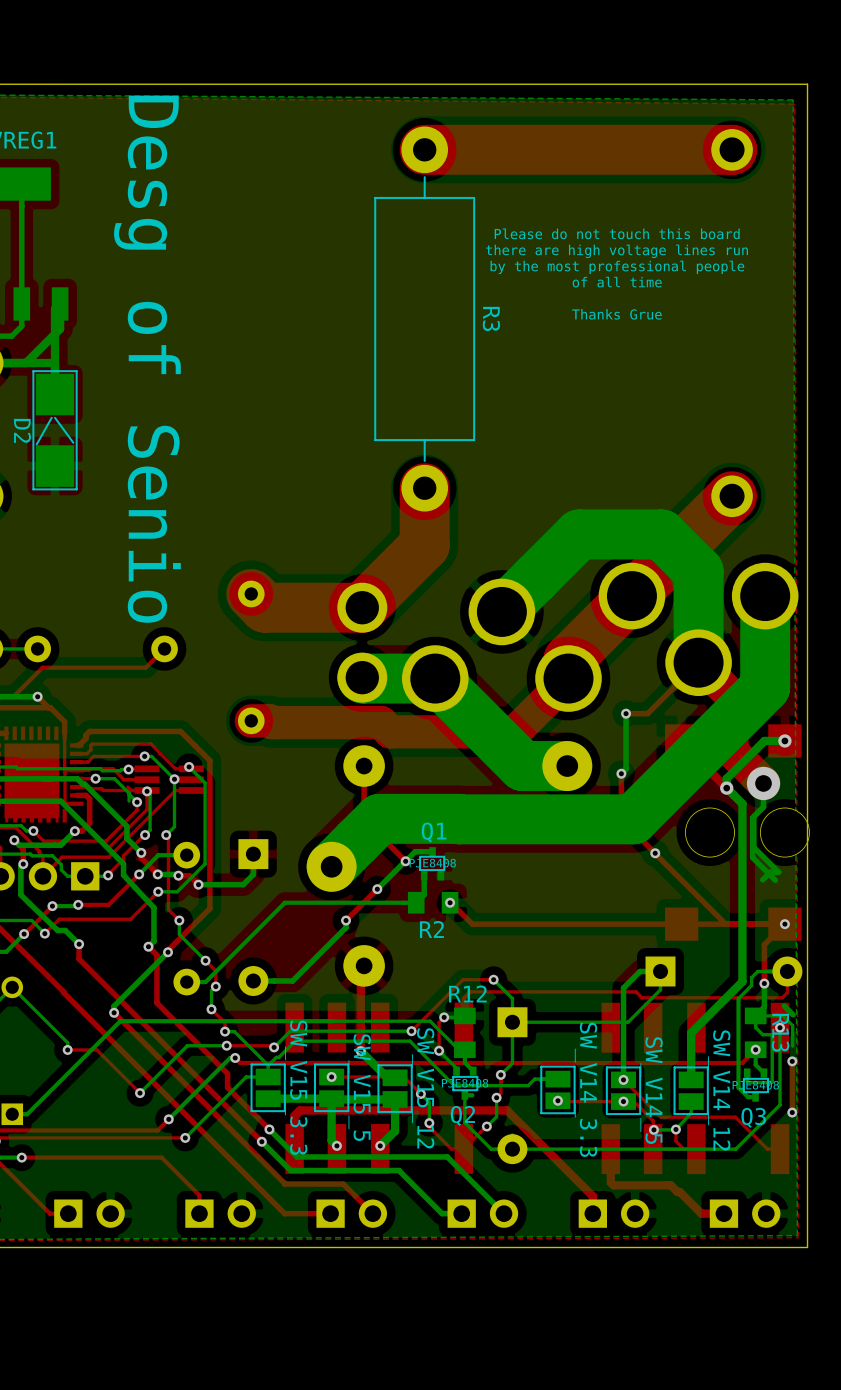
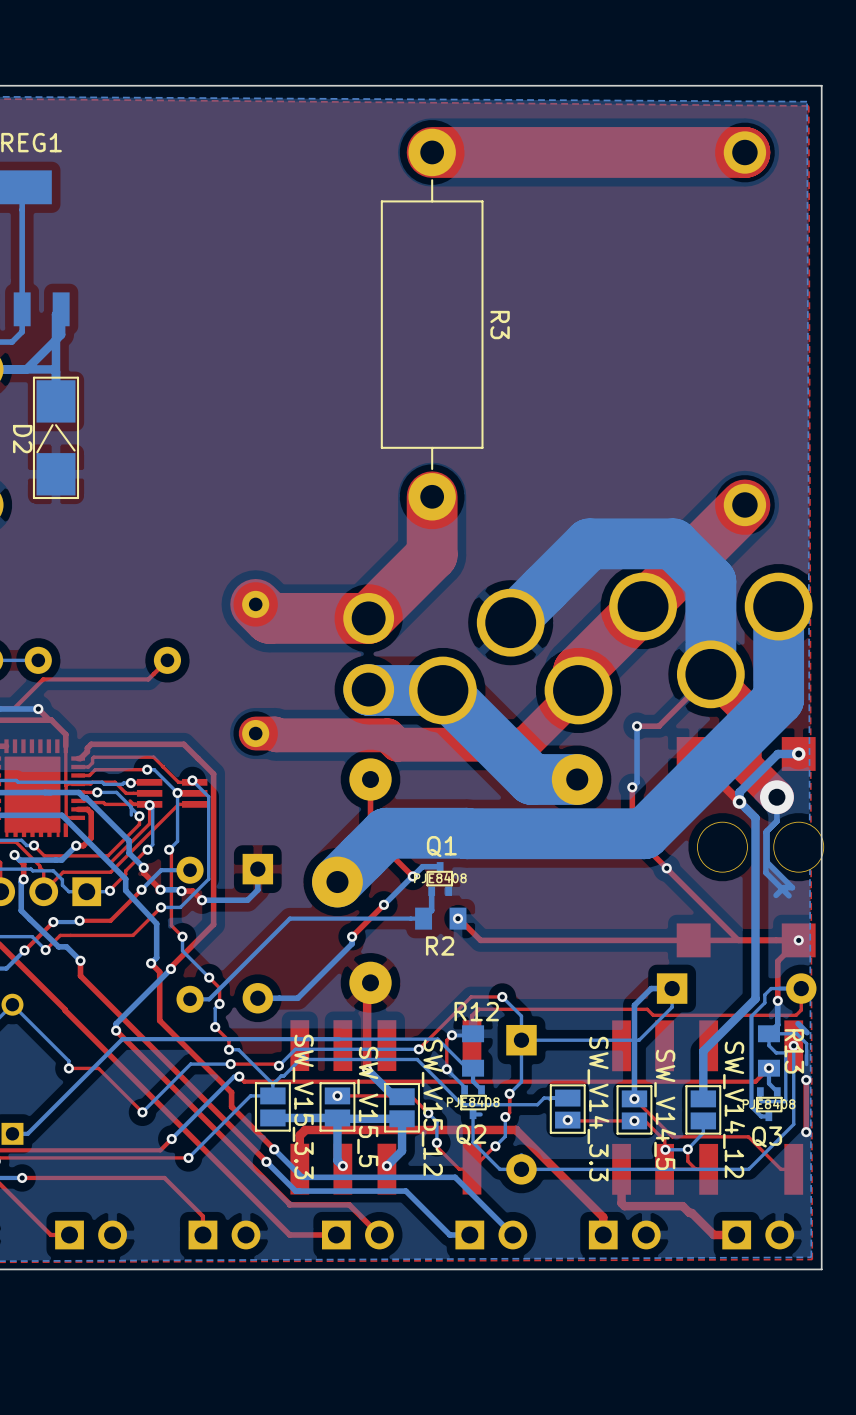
text: Please do not touch this board (617, 233) -> none
text: there are high voltage lines run (616, 251) -> none
text: by the most professional people (617, 267) -> none
text: of all time (617, 282) -> none
text: Thanks Grue (616, 314) -> none
text: Desg of Senio (147, 359) -> none

